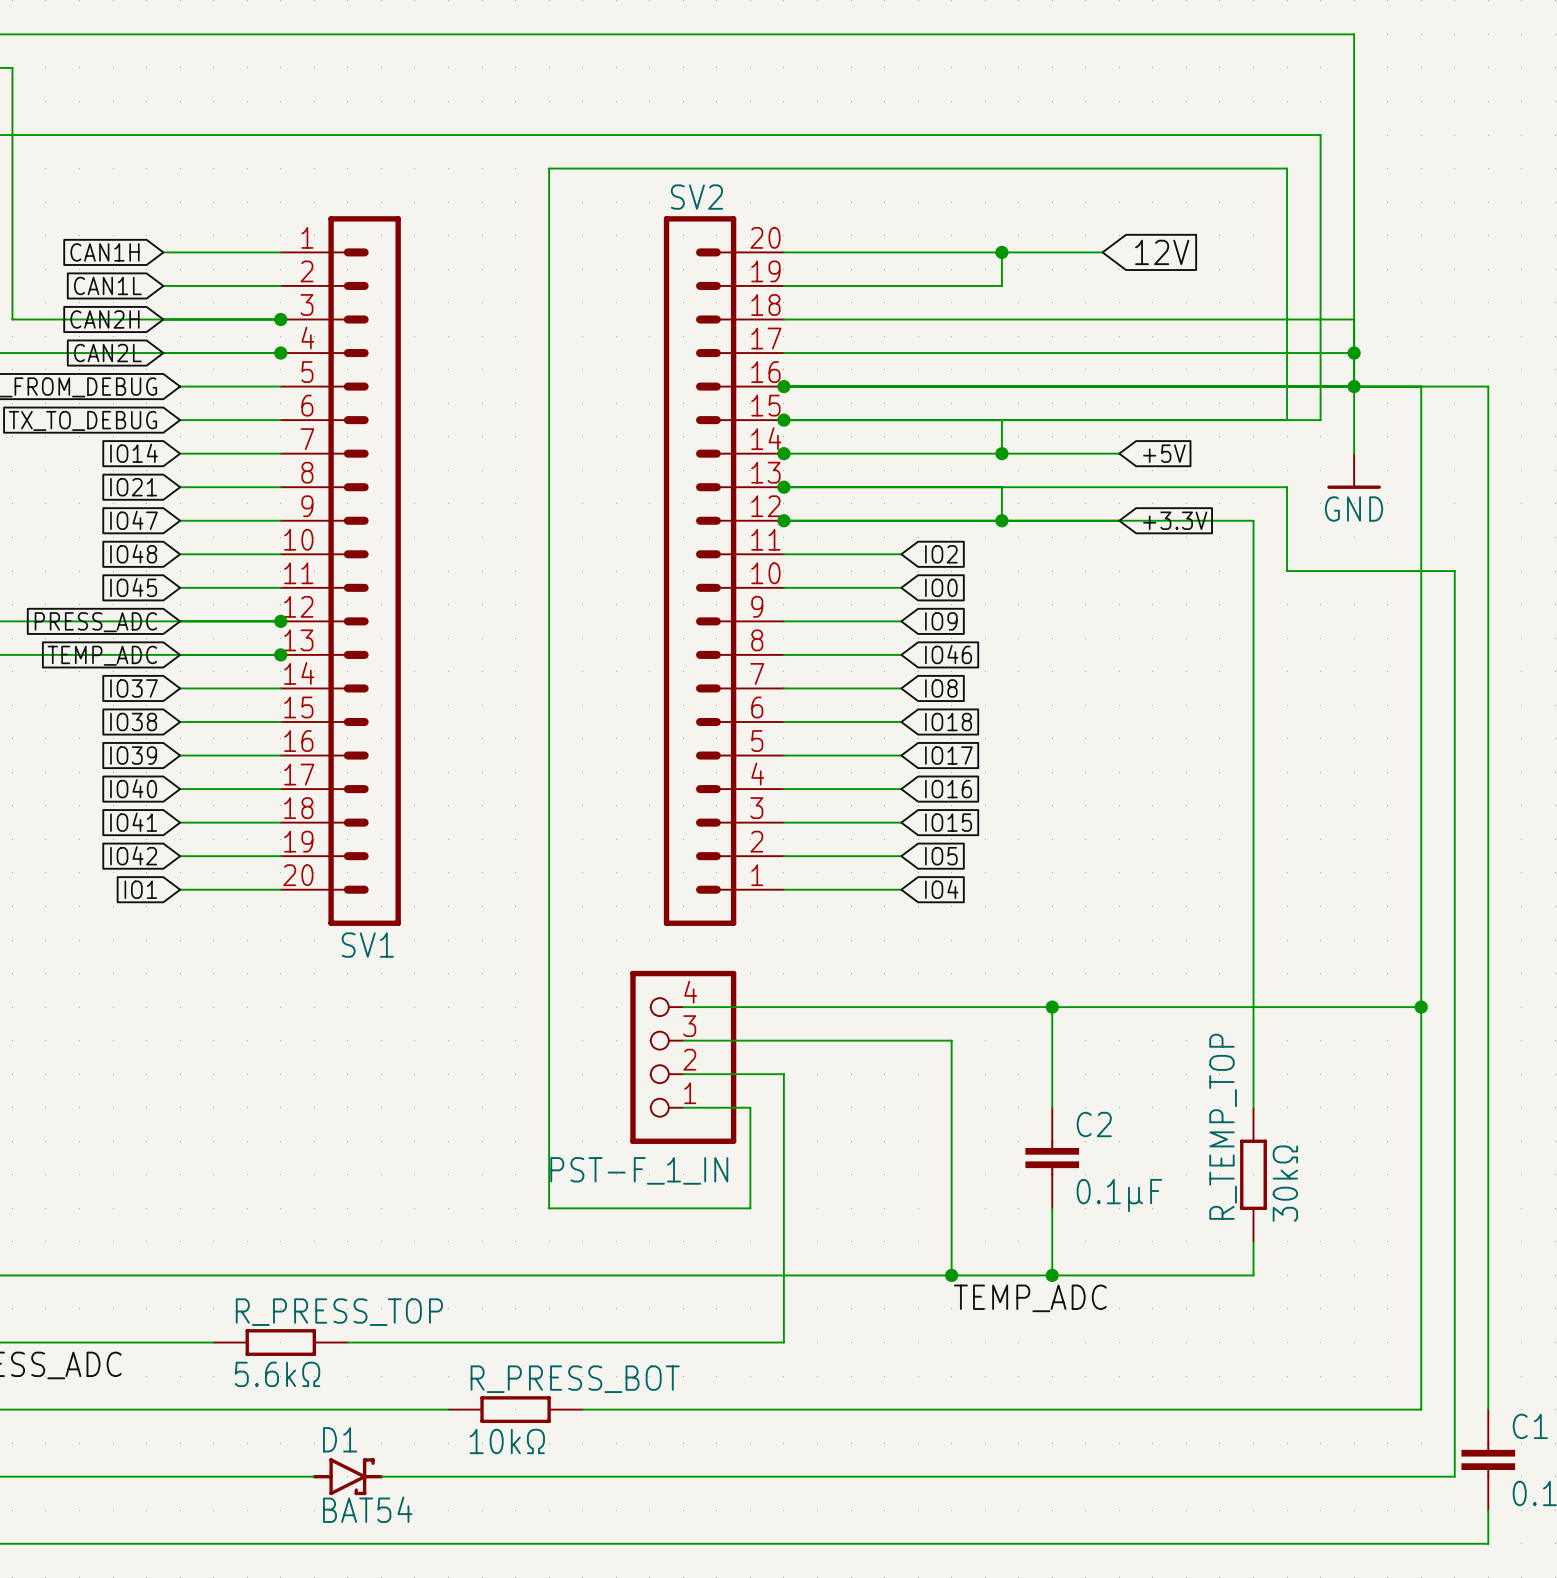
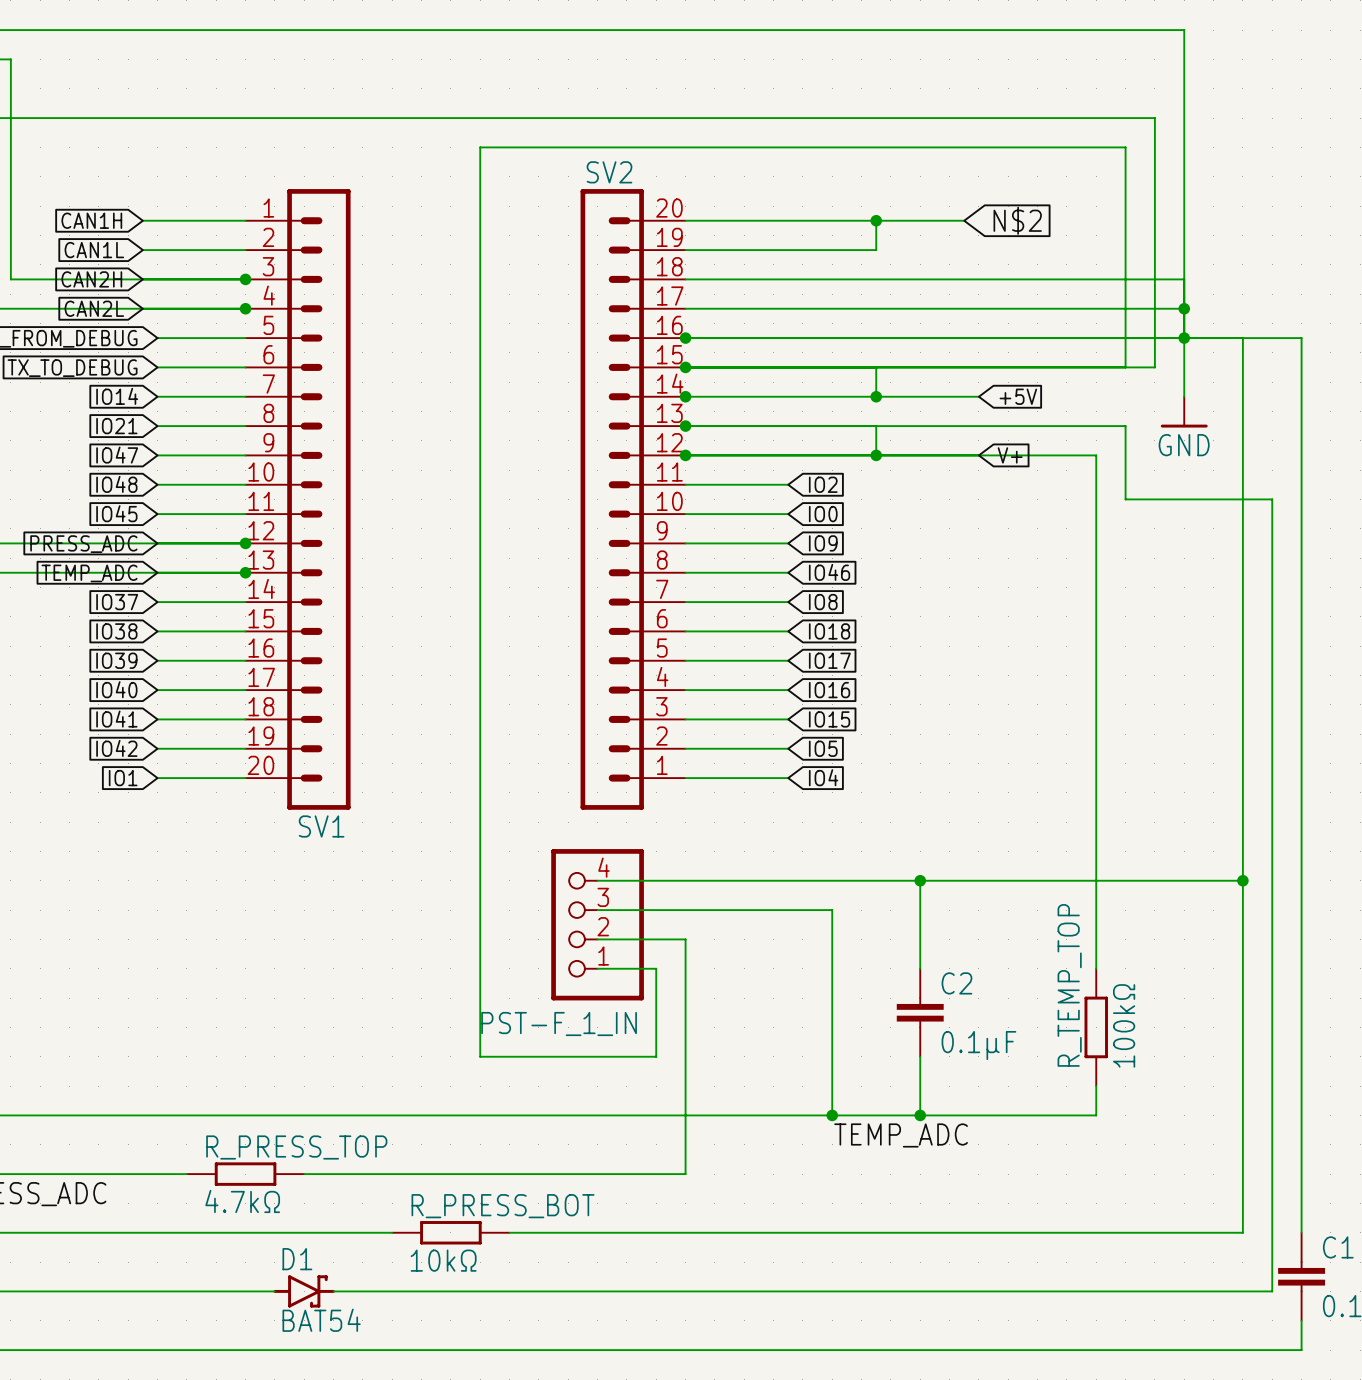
global label: 12V (1162, 252) -> N$2 (1017, 220)
global label: +3.3V (1175, 520) -> V+ (1010, 455)
R_TEMP_TOP value: 30kΩ (1285, 1183) -> 100kΩ (1124, 1025)
R_PRESS_TOP value: 5.6kΩ (277, 1374) -> 4.7kΩ (242, 1201)

